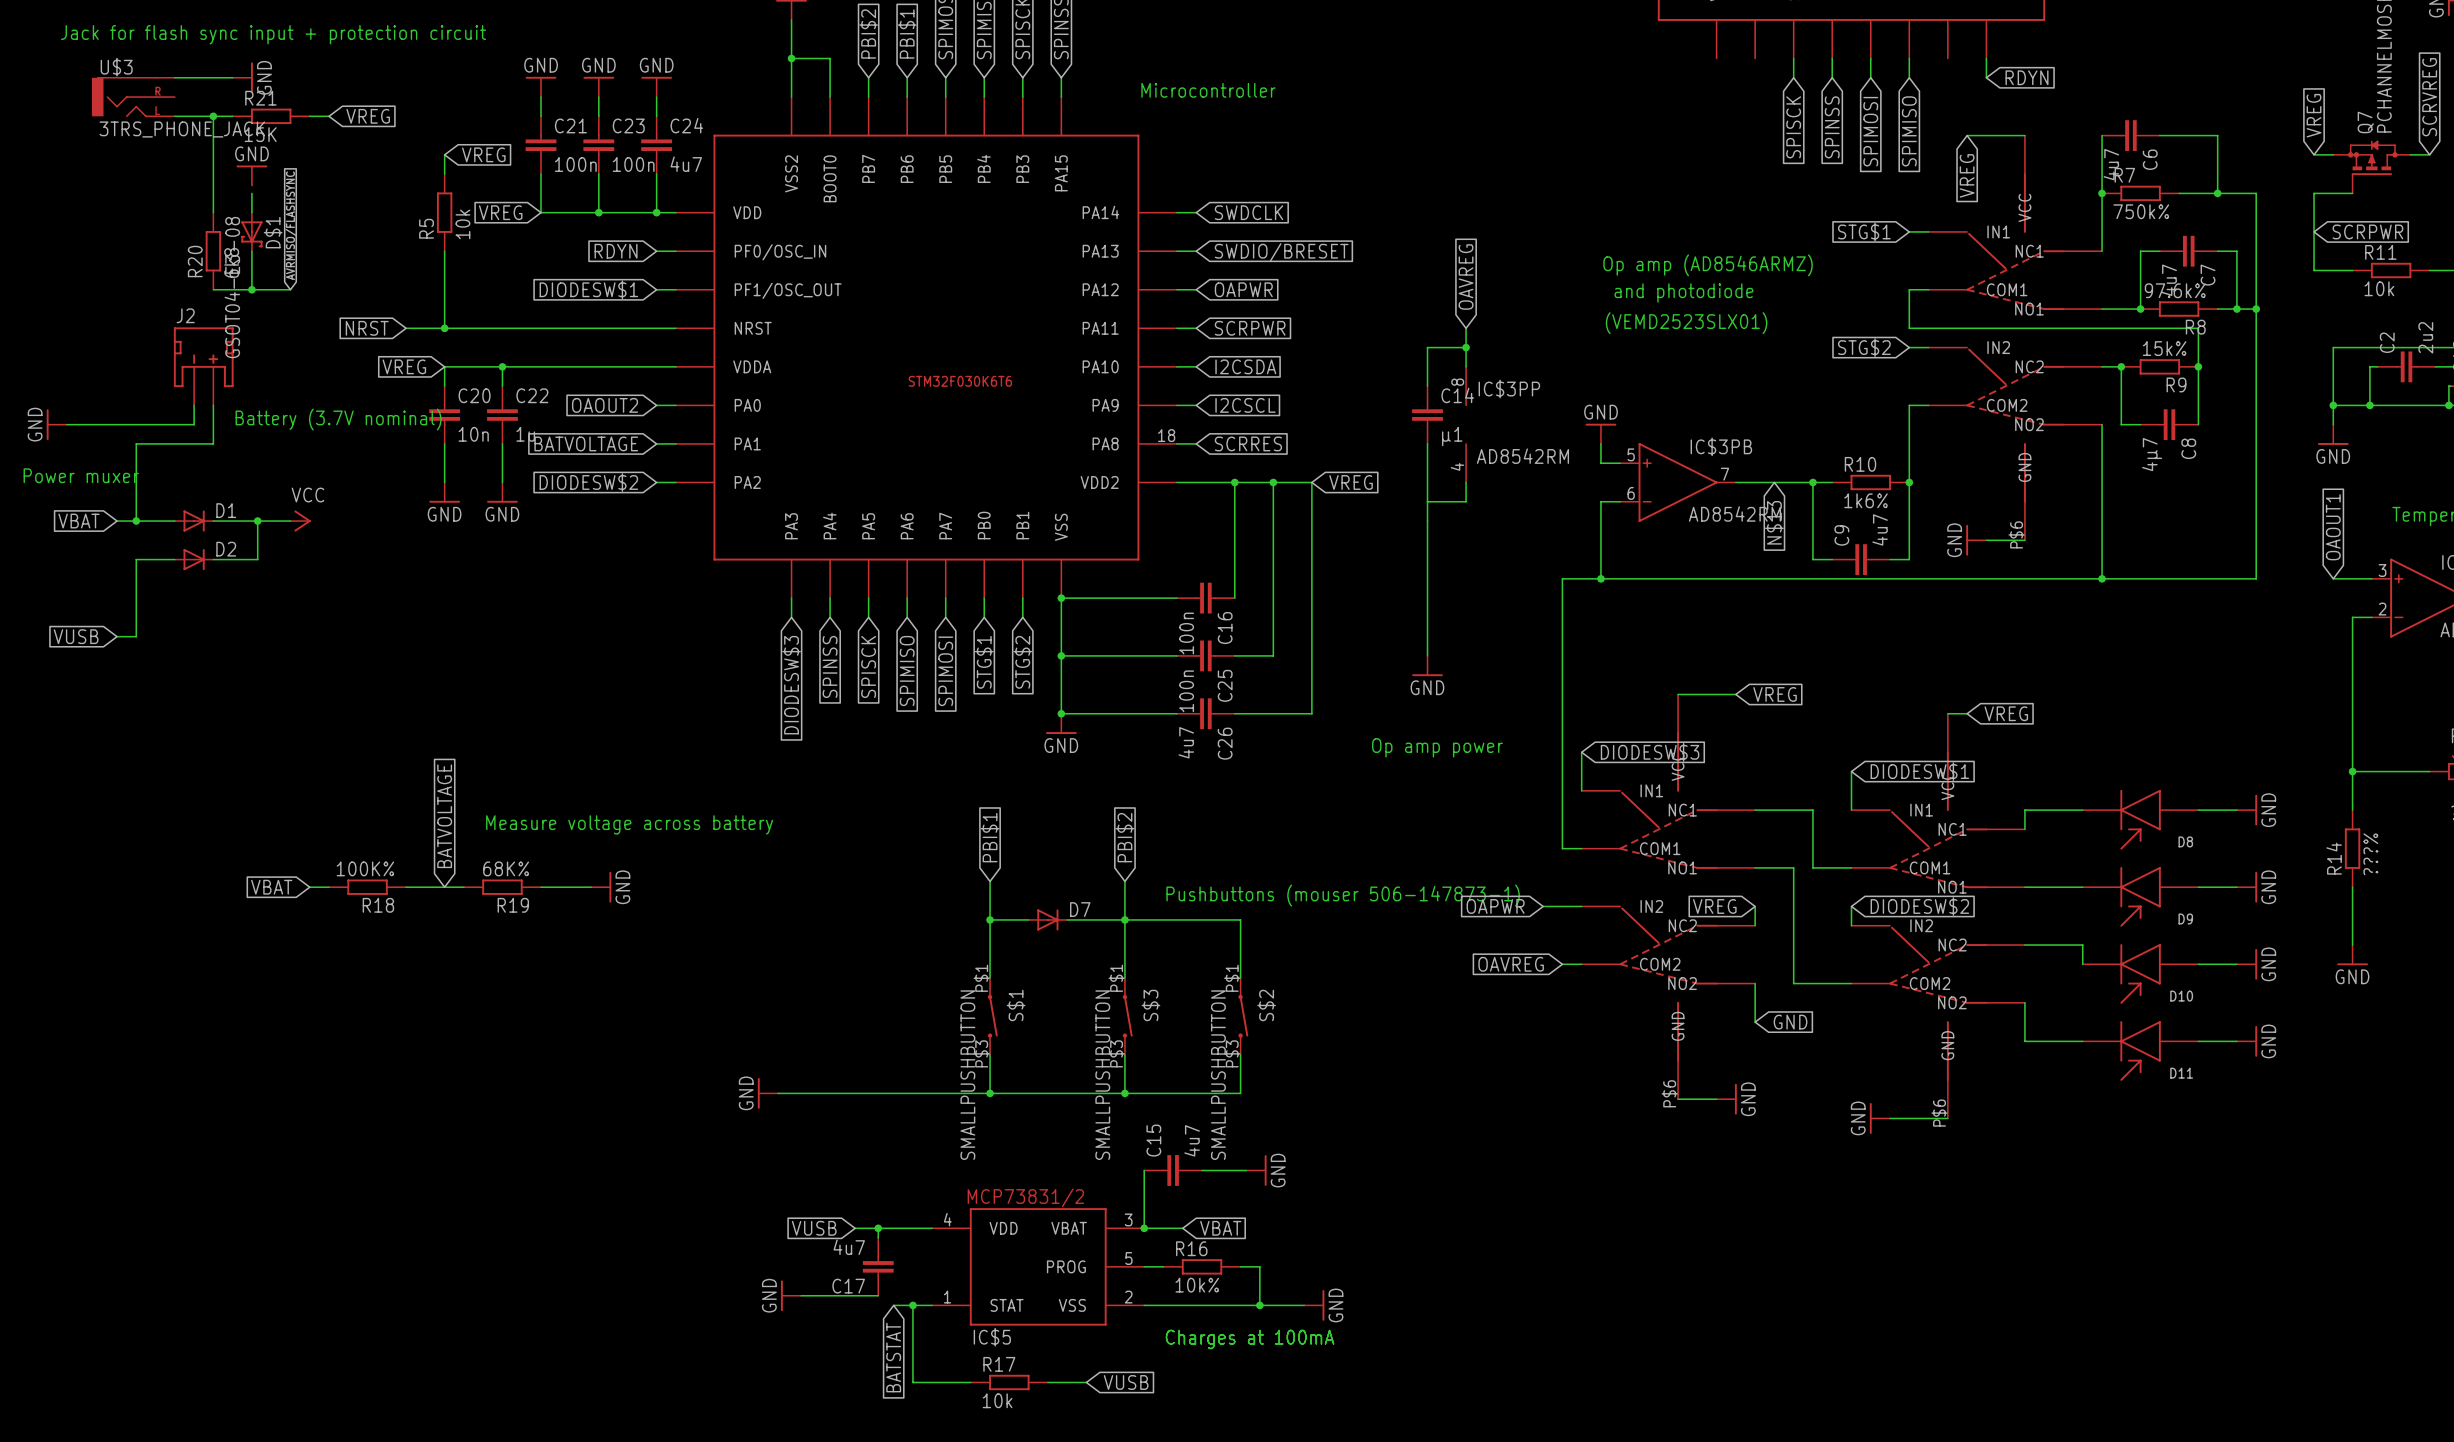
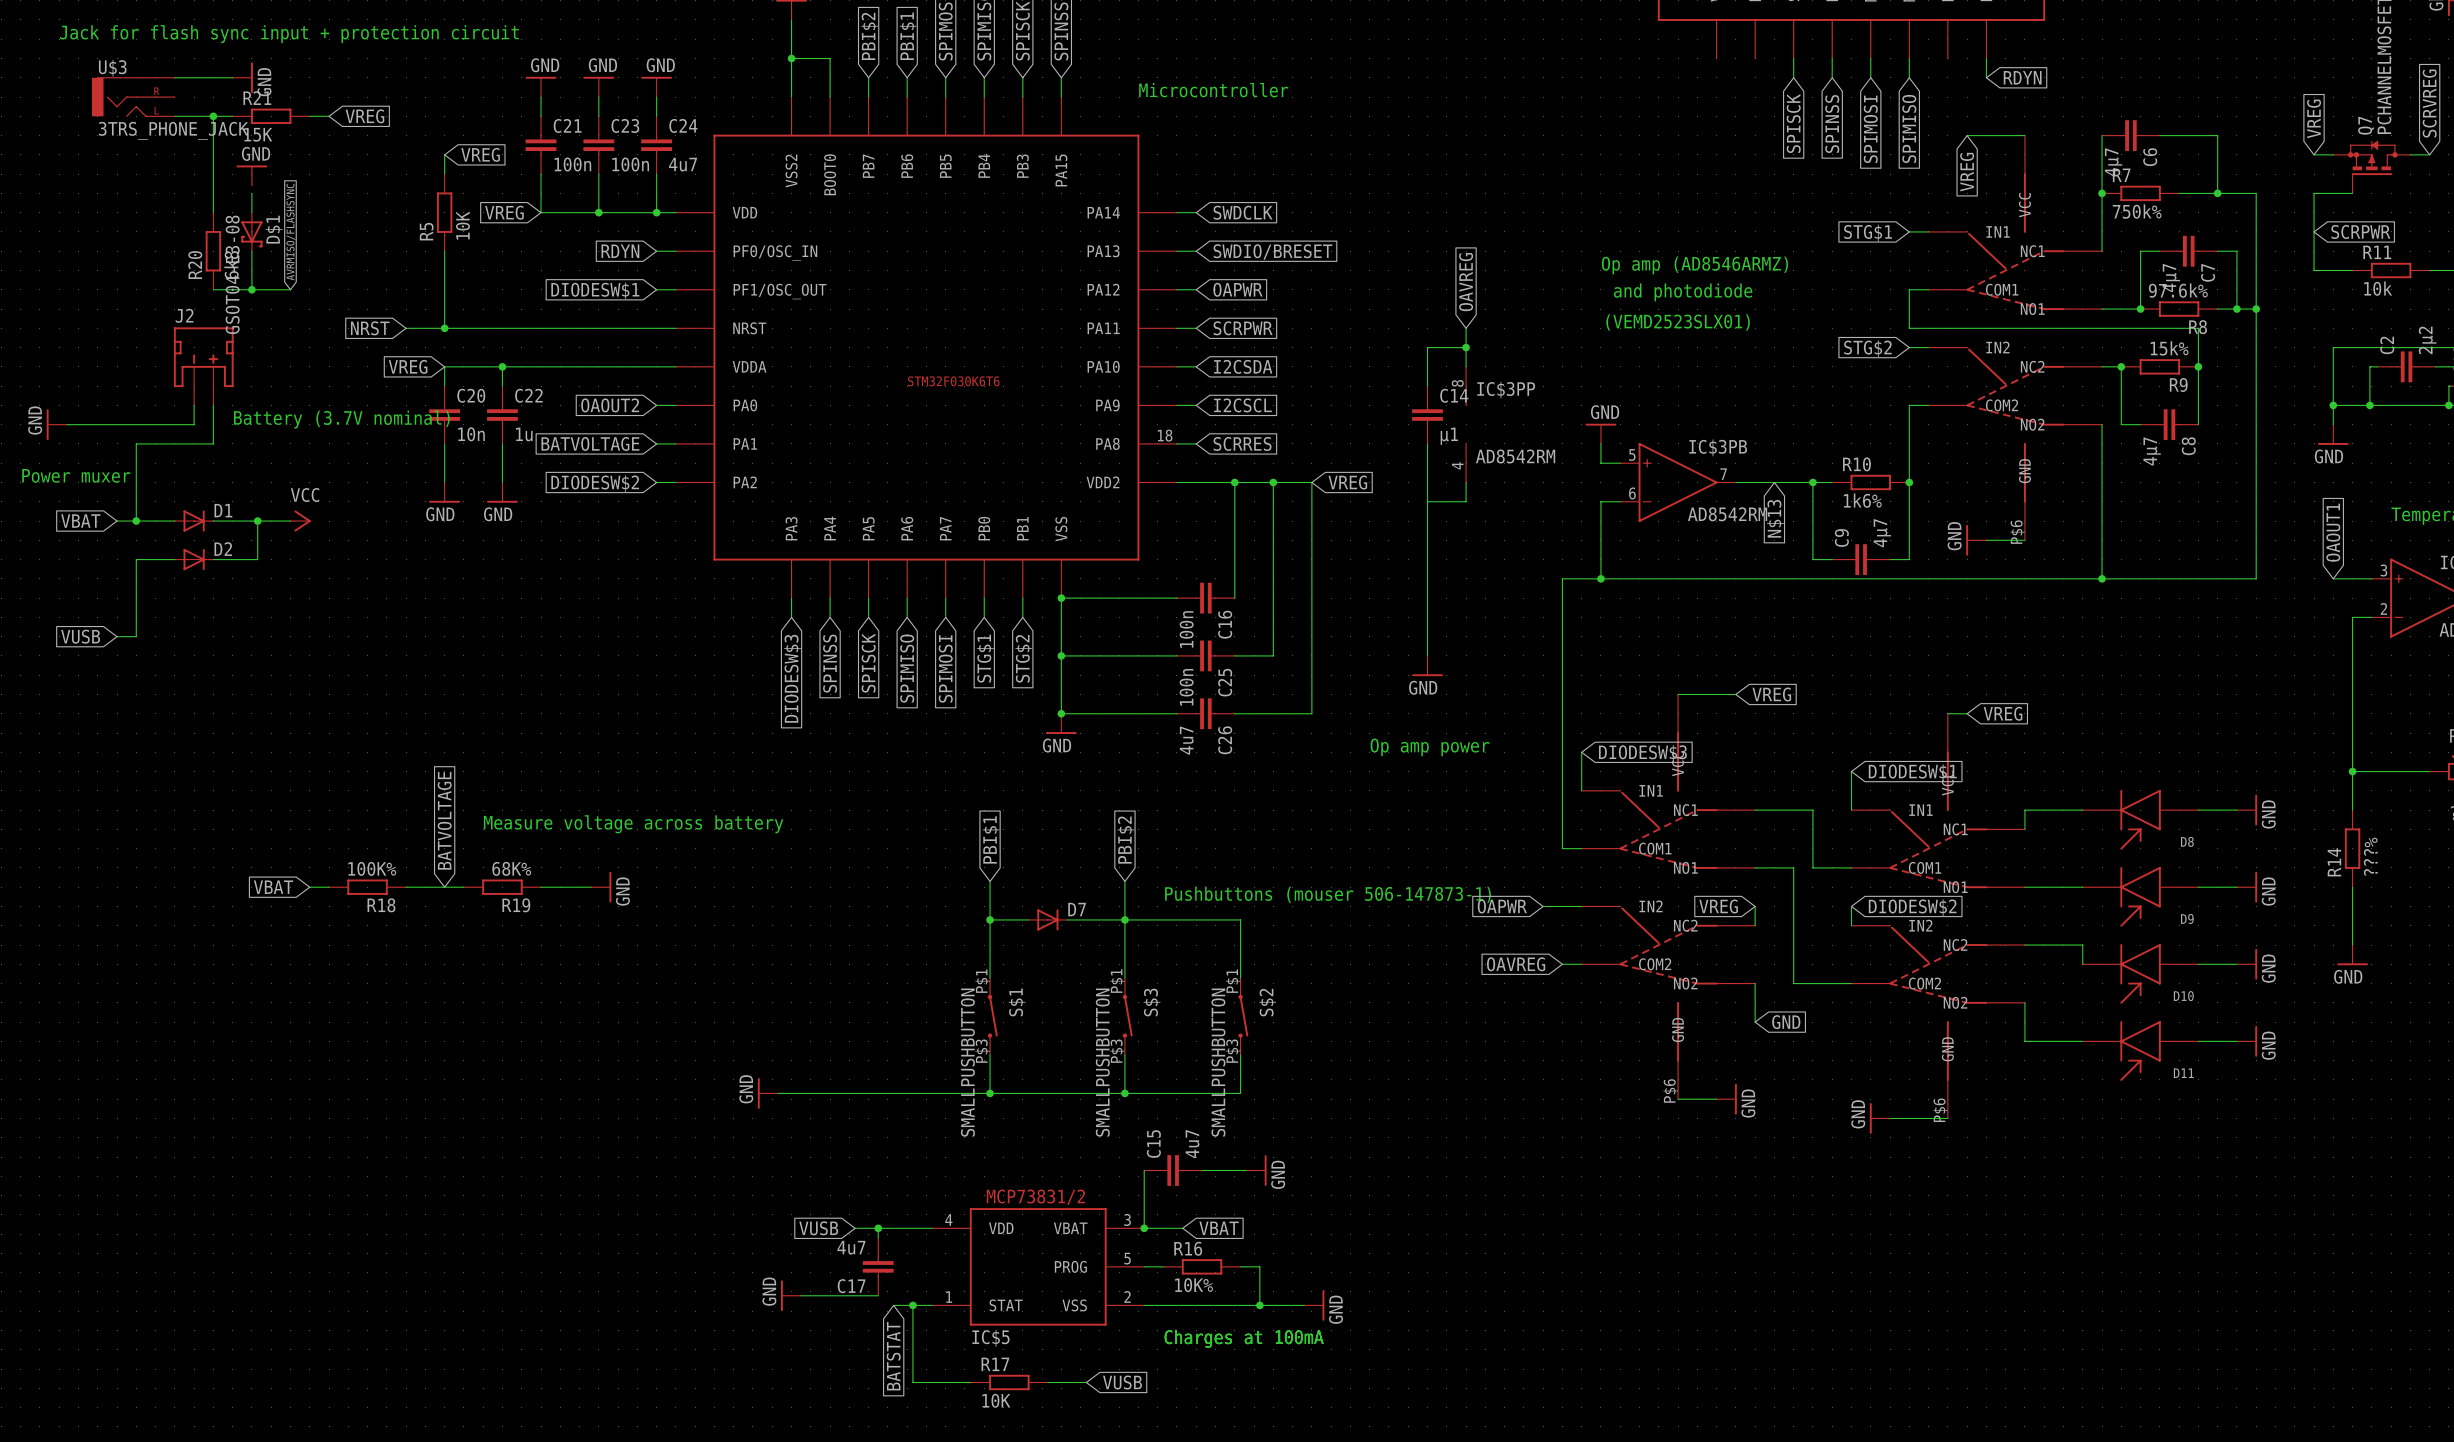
C6 value: 4u7 (2111, 164) -> 4µ7 (2113, 162)
R5 value: 10k (462, 224) -> 10K (462, 225)
C7 value: 4u7 (2169, 280) -> 4µ7 (2171, 278)
C2 value: 2u2 (2425, 337) -> 2µ2 (2427, 340)
C9 value: 4u7 (1880, 529) -> 4µ7 (1882, 533)
R16 value: 10k% (1197, 1285) -> 10K% (1194, 1285)
R17 value: 10k (997, 1400) -> 10K (996, 1400)

